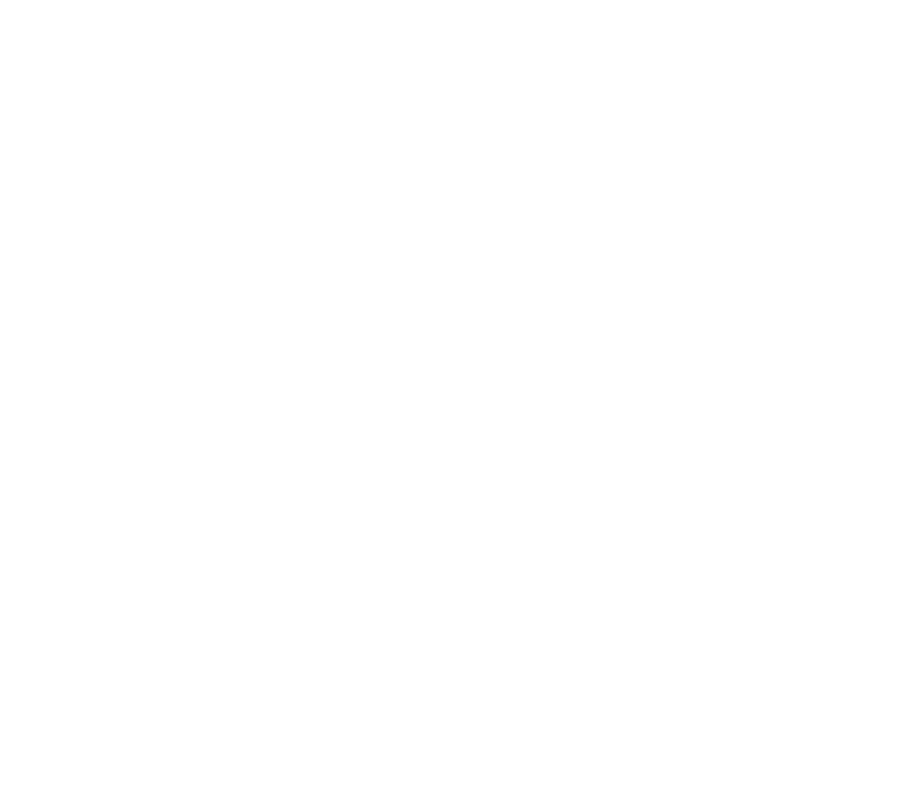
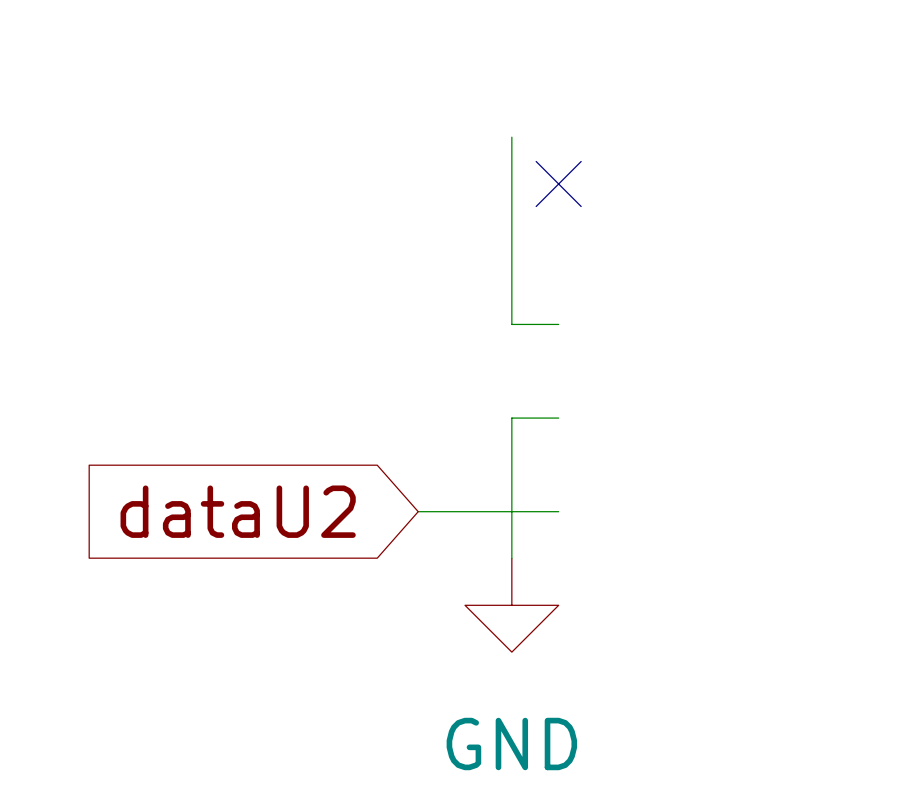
wire: none -> (511, 137) (511, 324) (558, 324)
no-connect mark: none -> (558, 184)
wire: none -> (558, 418) (511, 418) (511, 558)
global label: none -> dataU2 (238, 511)
wire: none -> (418, 511) (558, 511)
power symbol: none -> GND (511, 605)

